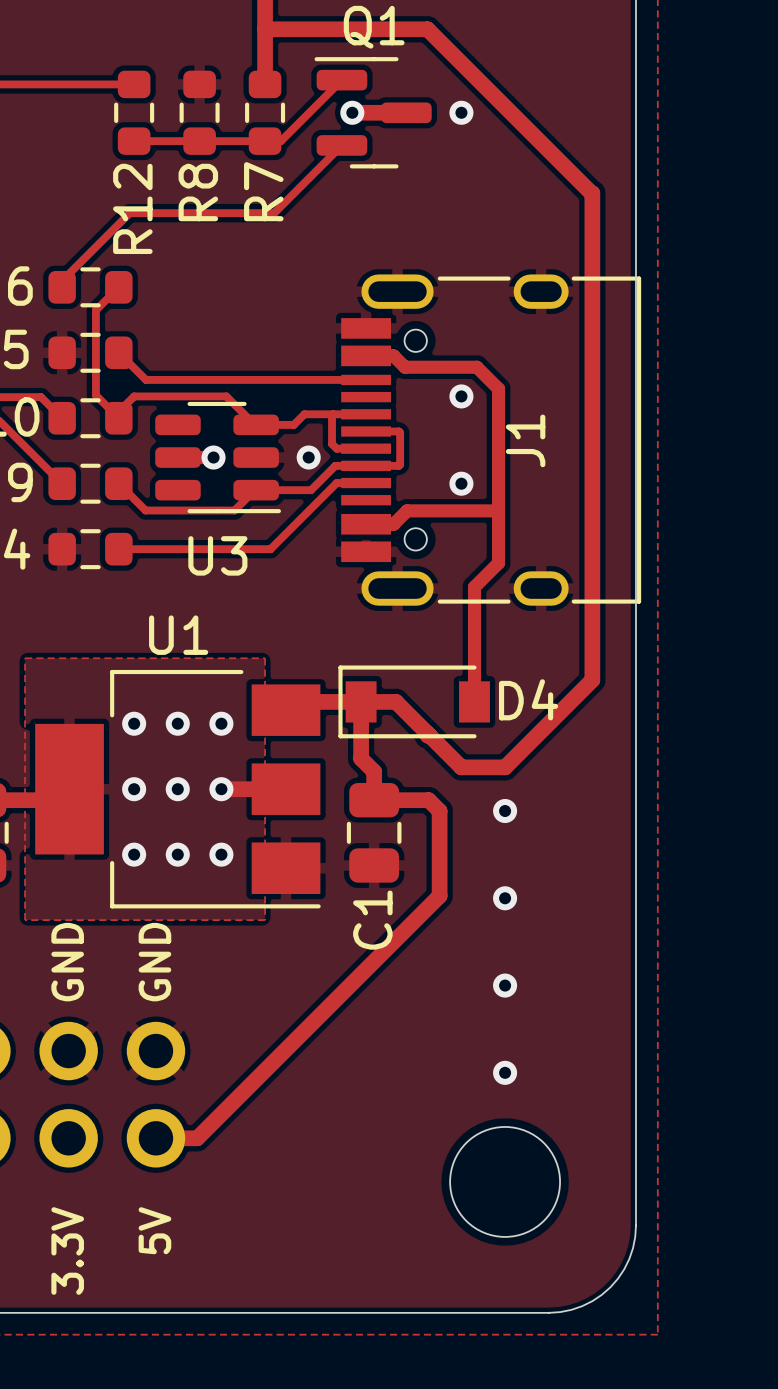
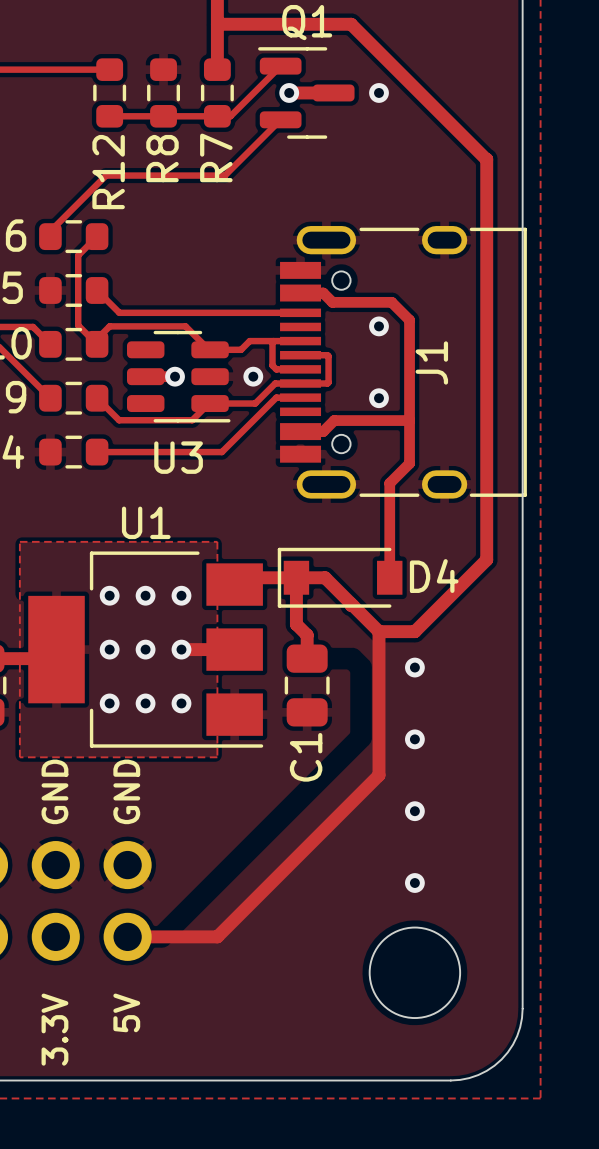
track: (374, 800) (428, 800) (439, 811) (439, 895) (197, 1138) -> (379, 631) (379, 775) (217, 936) (161, 936)

